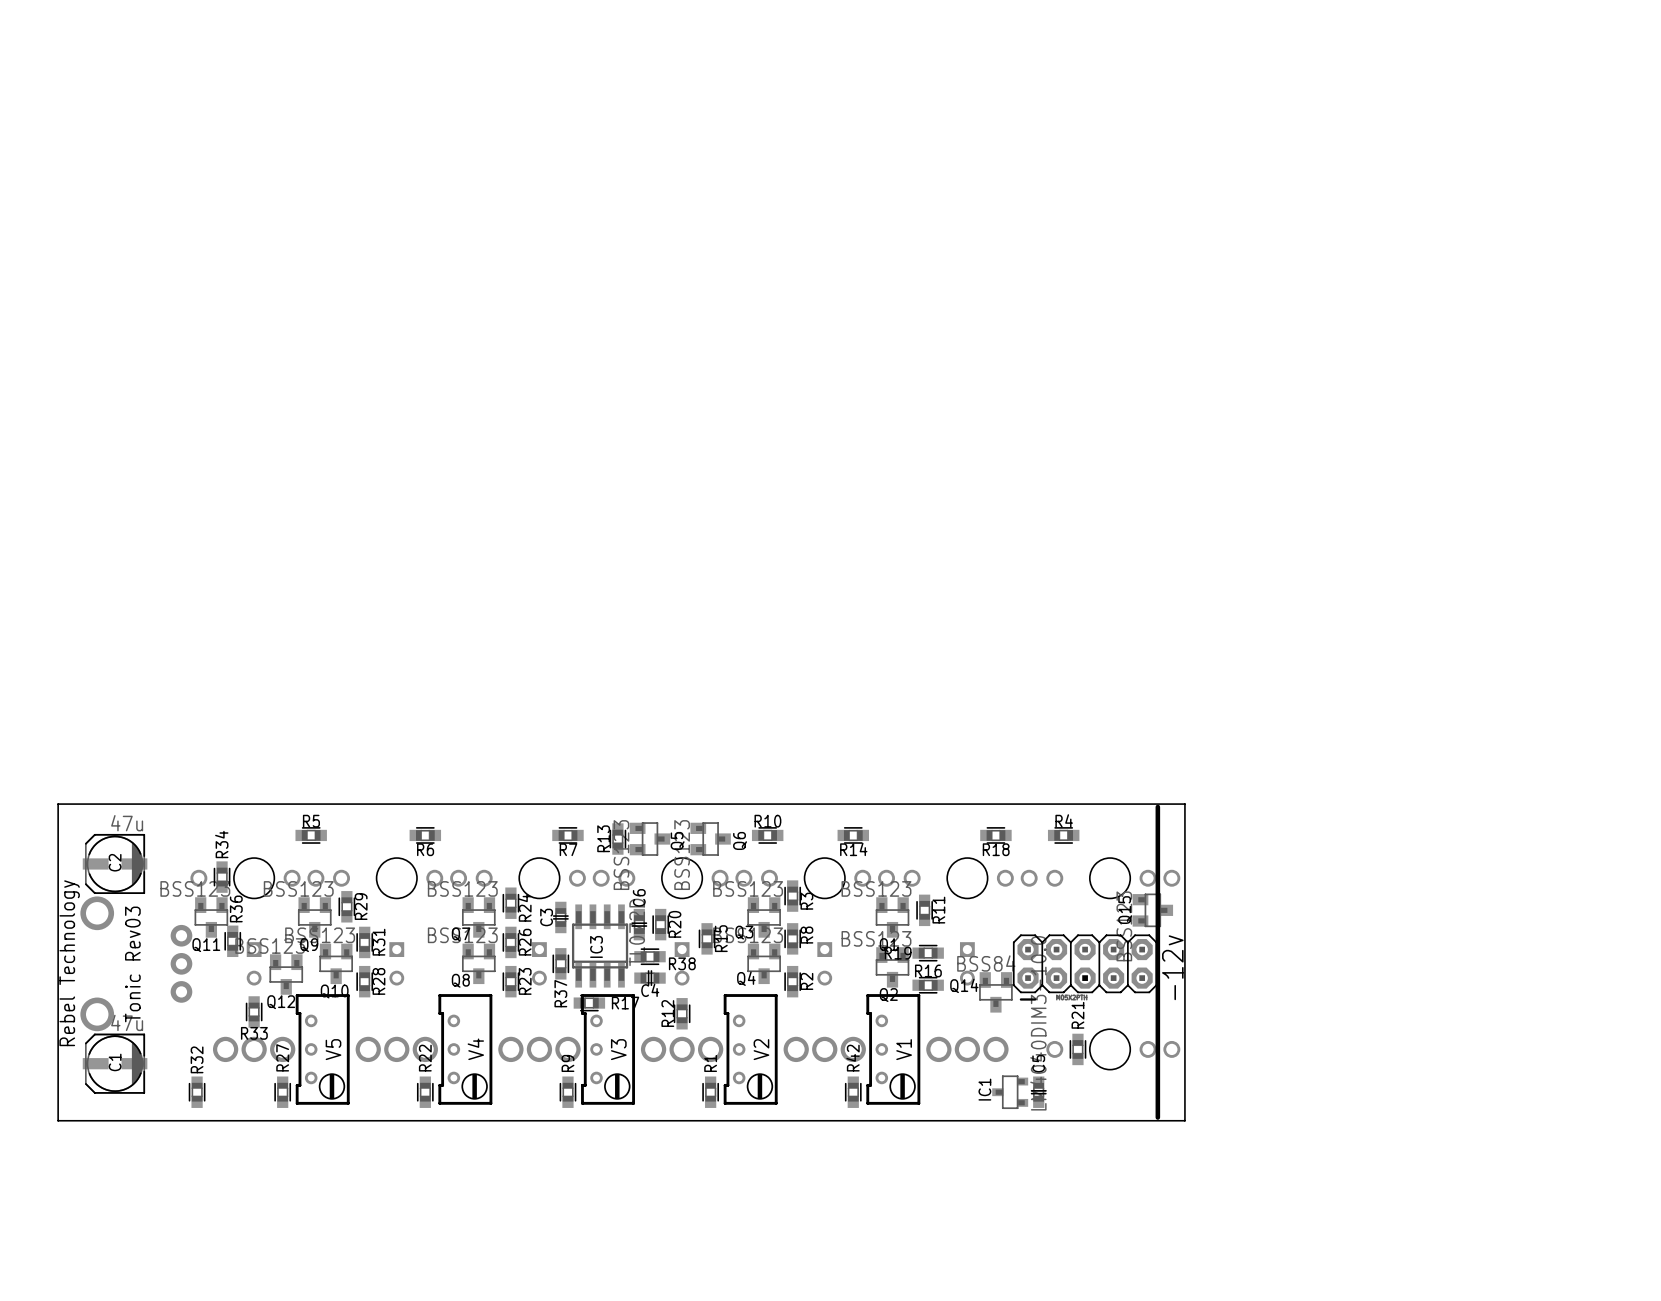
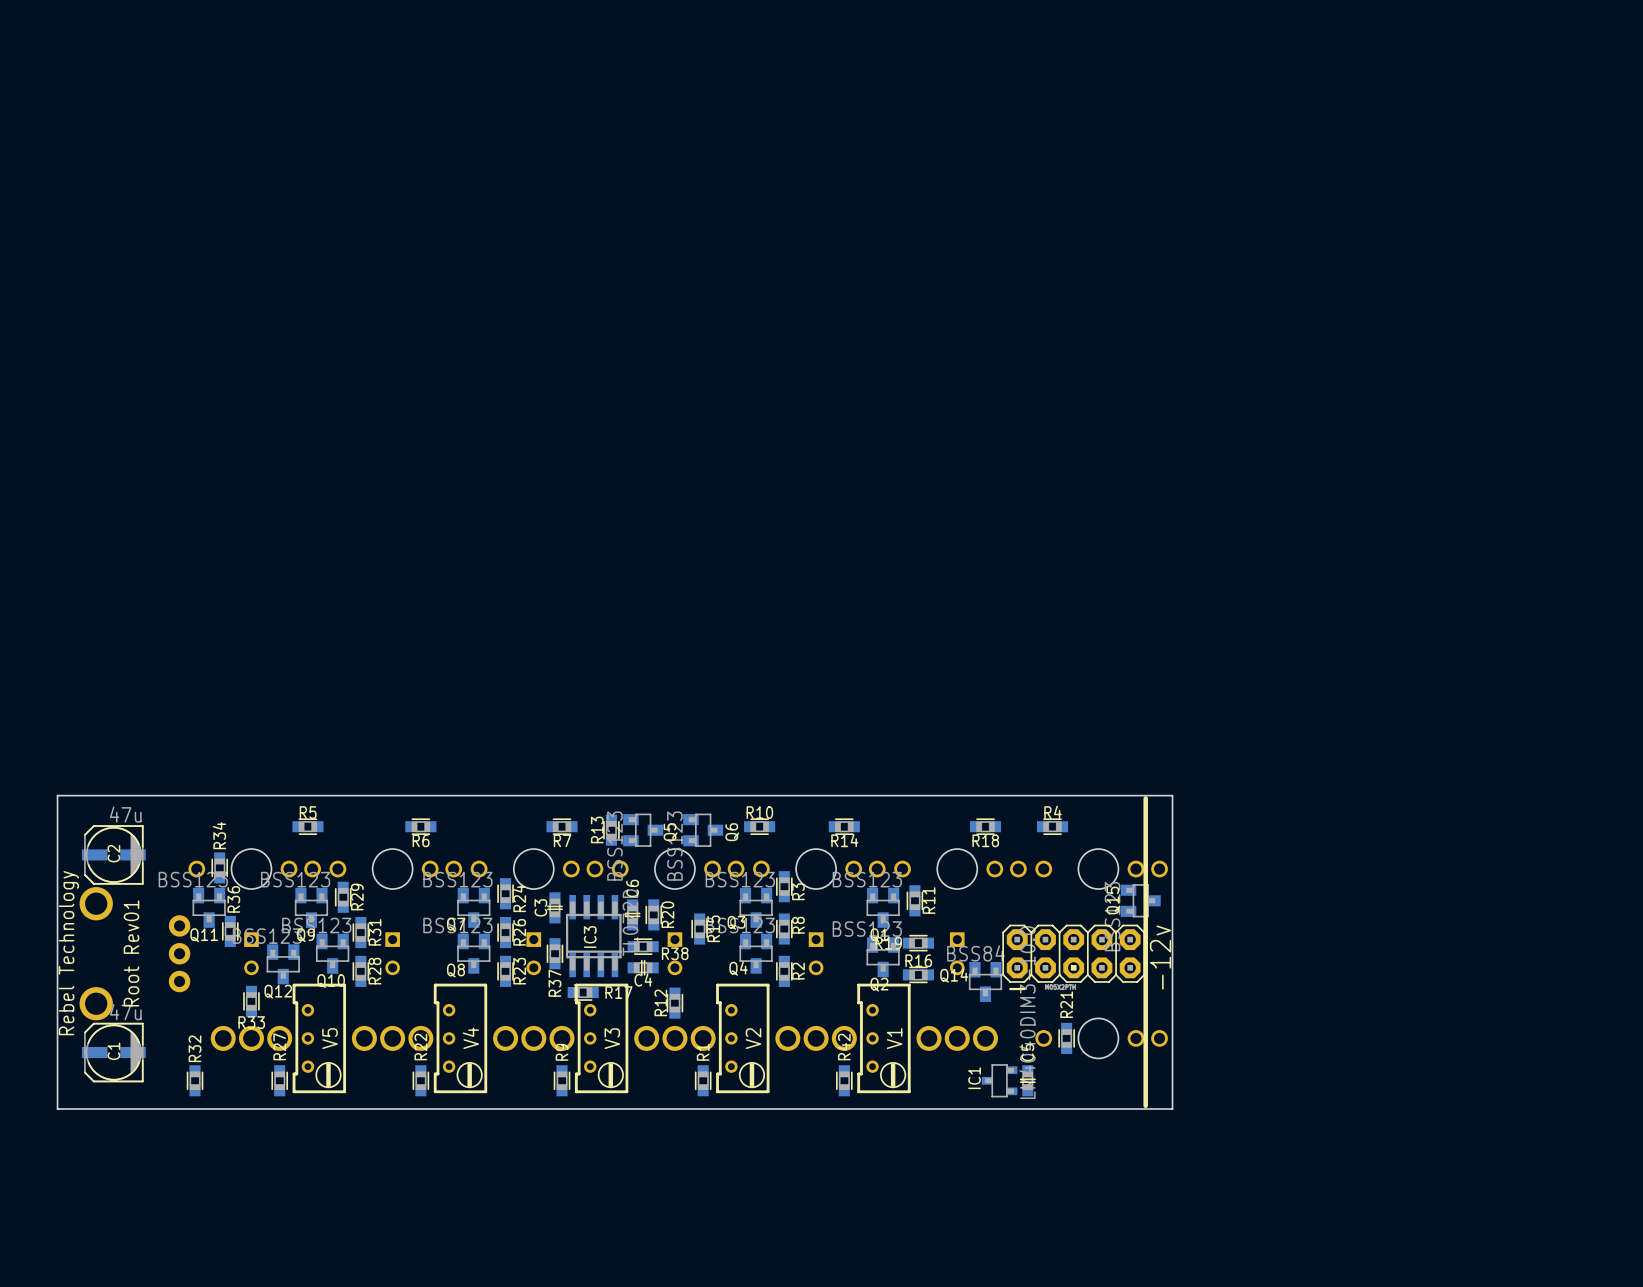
text: Tonic Rev03 (132, 964) -> Root Rev01 (131, 953)

